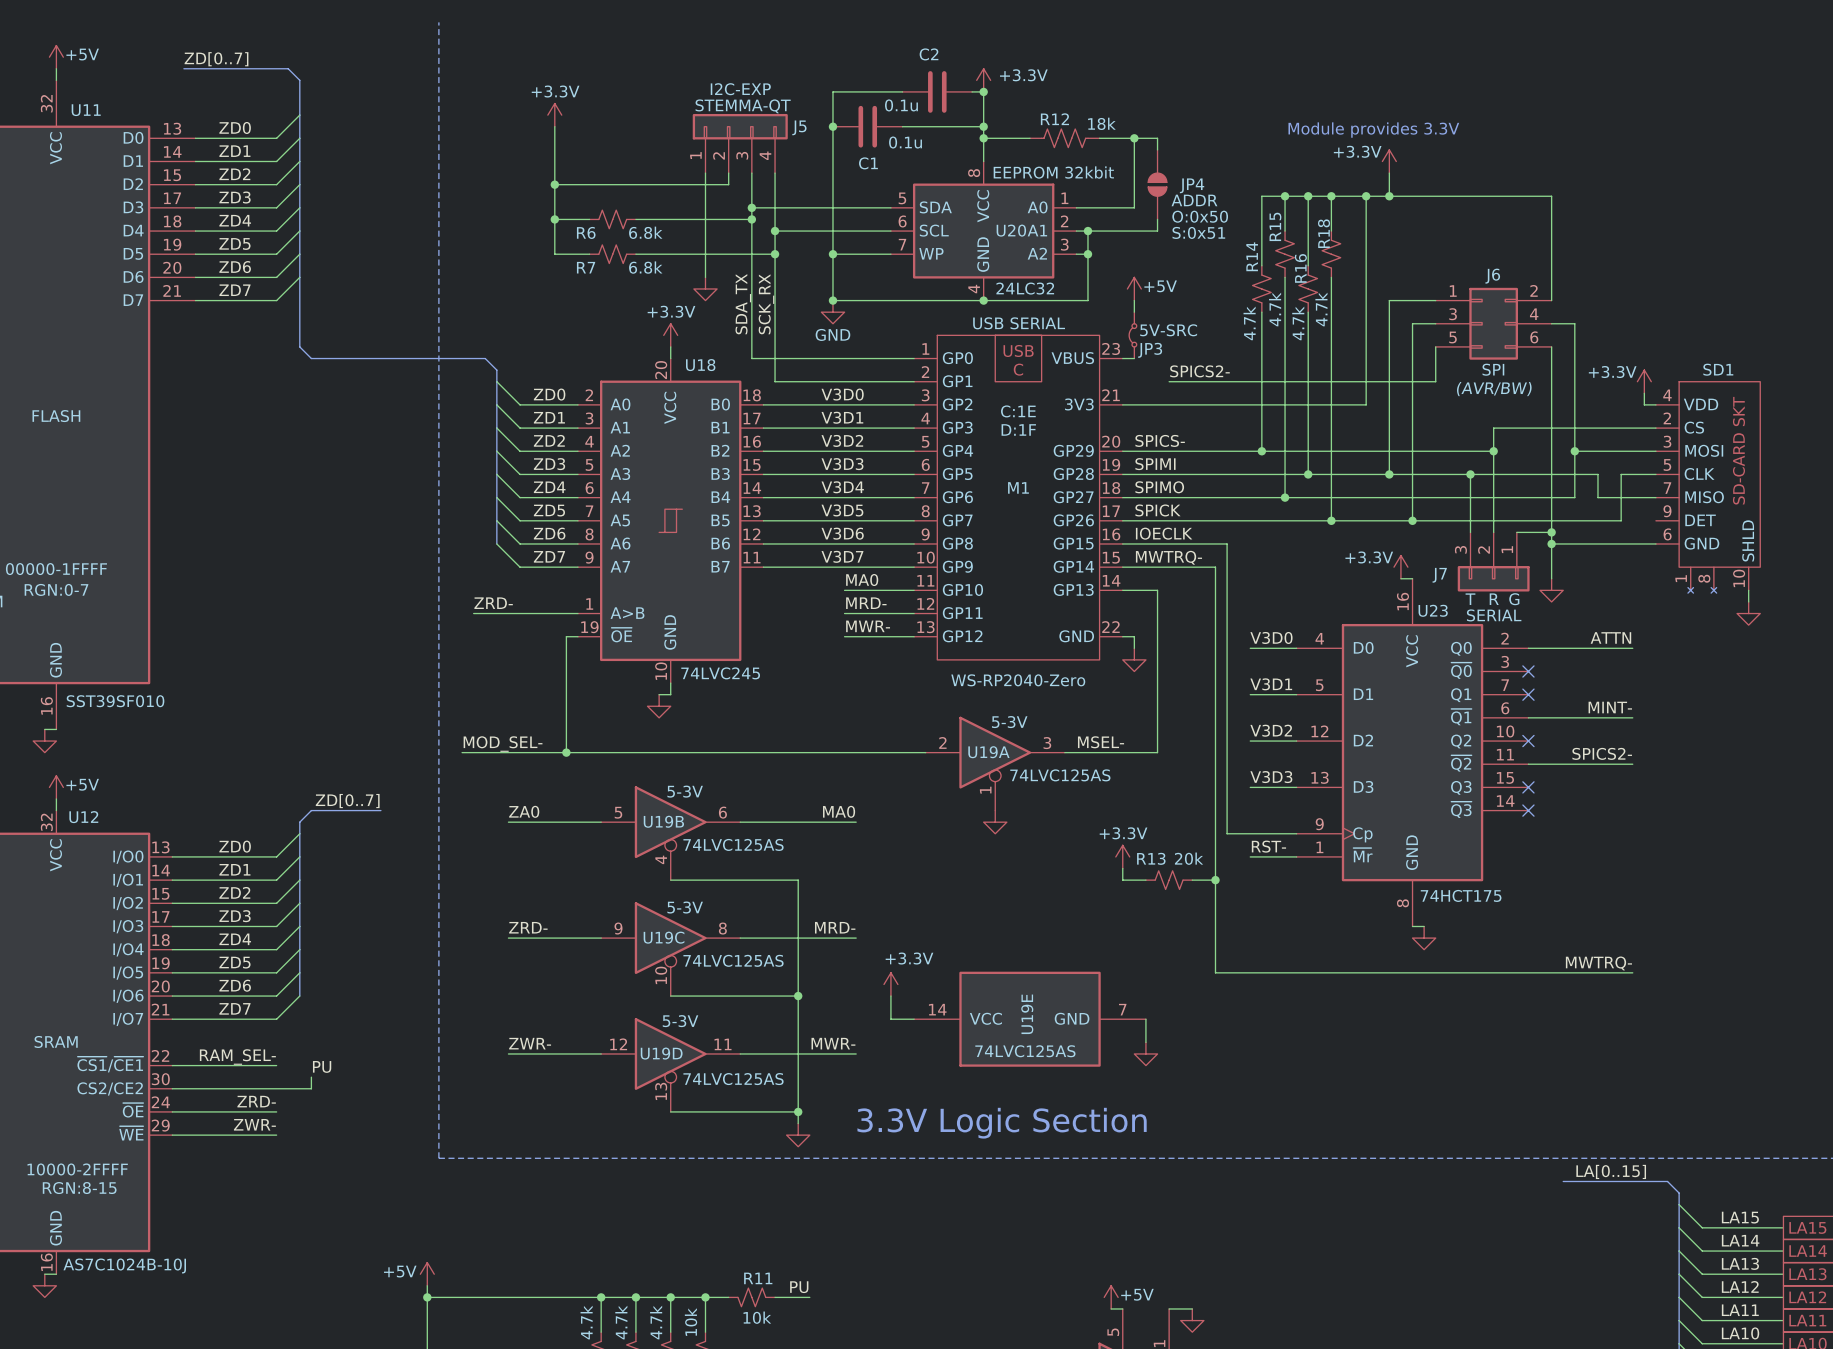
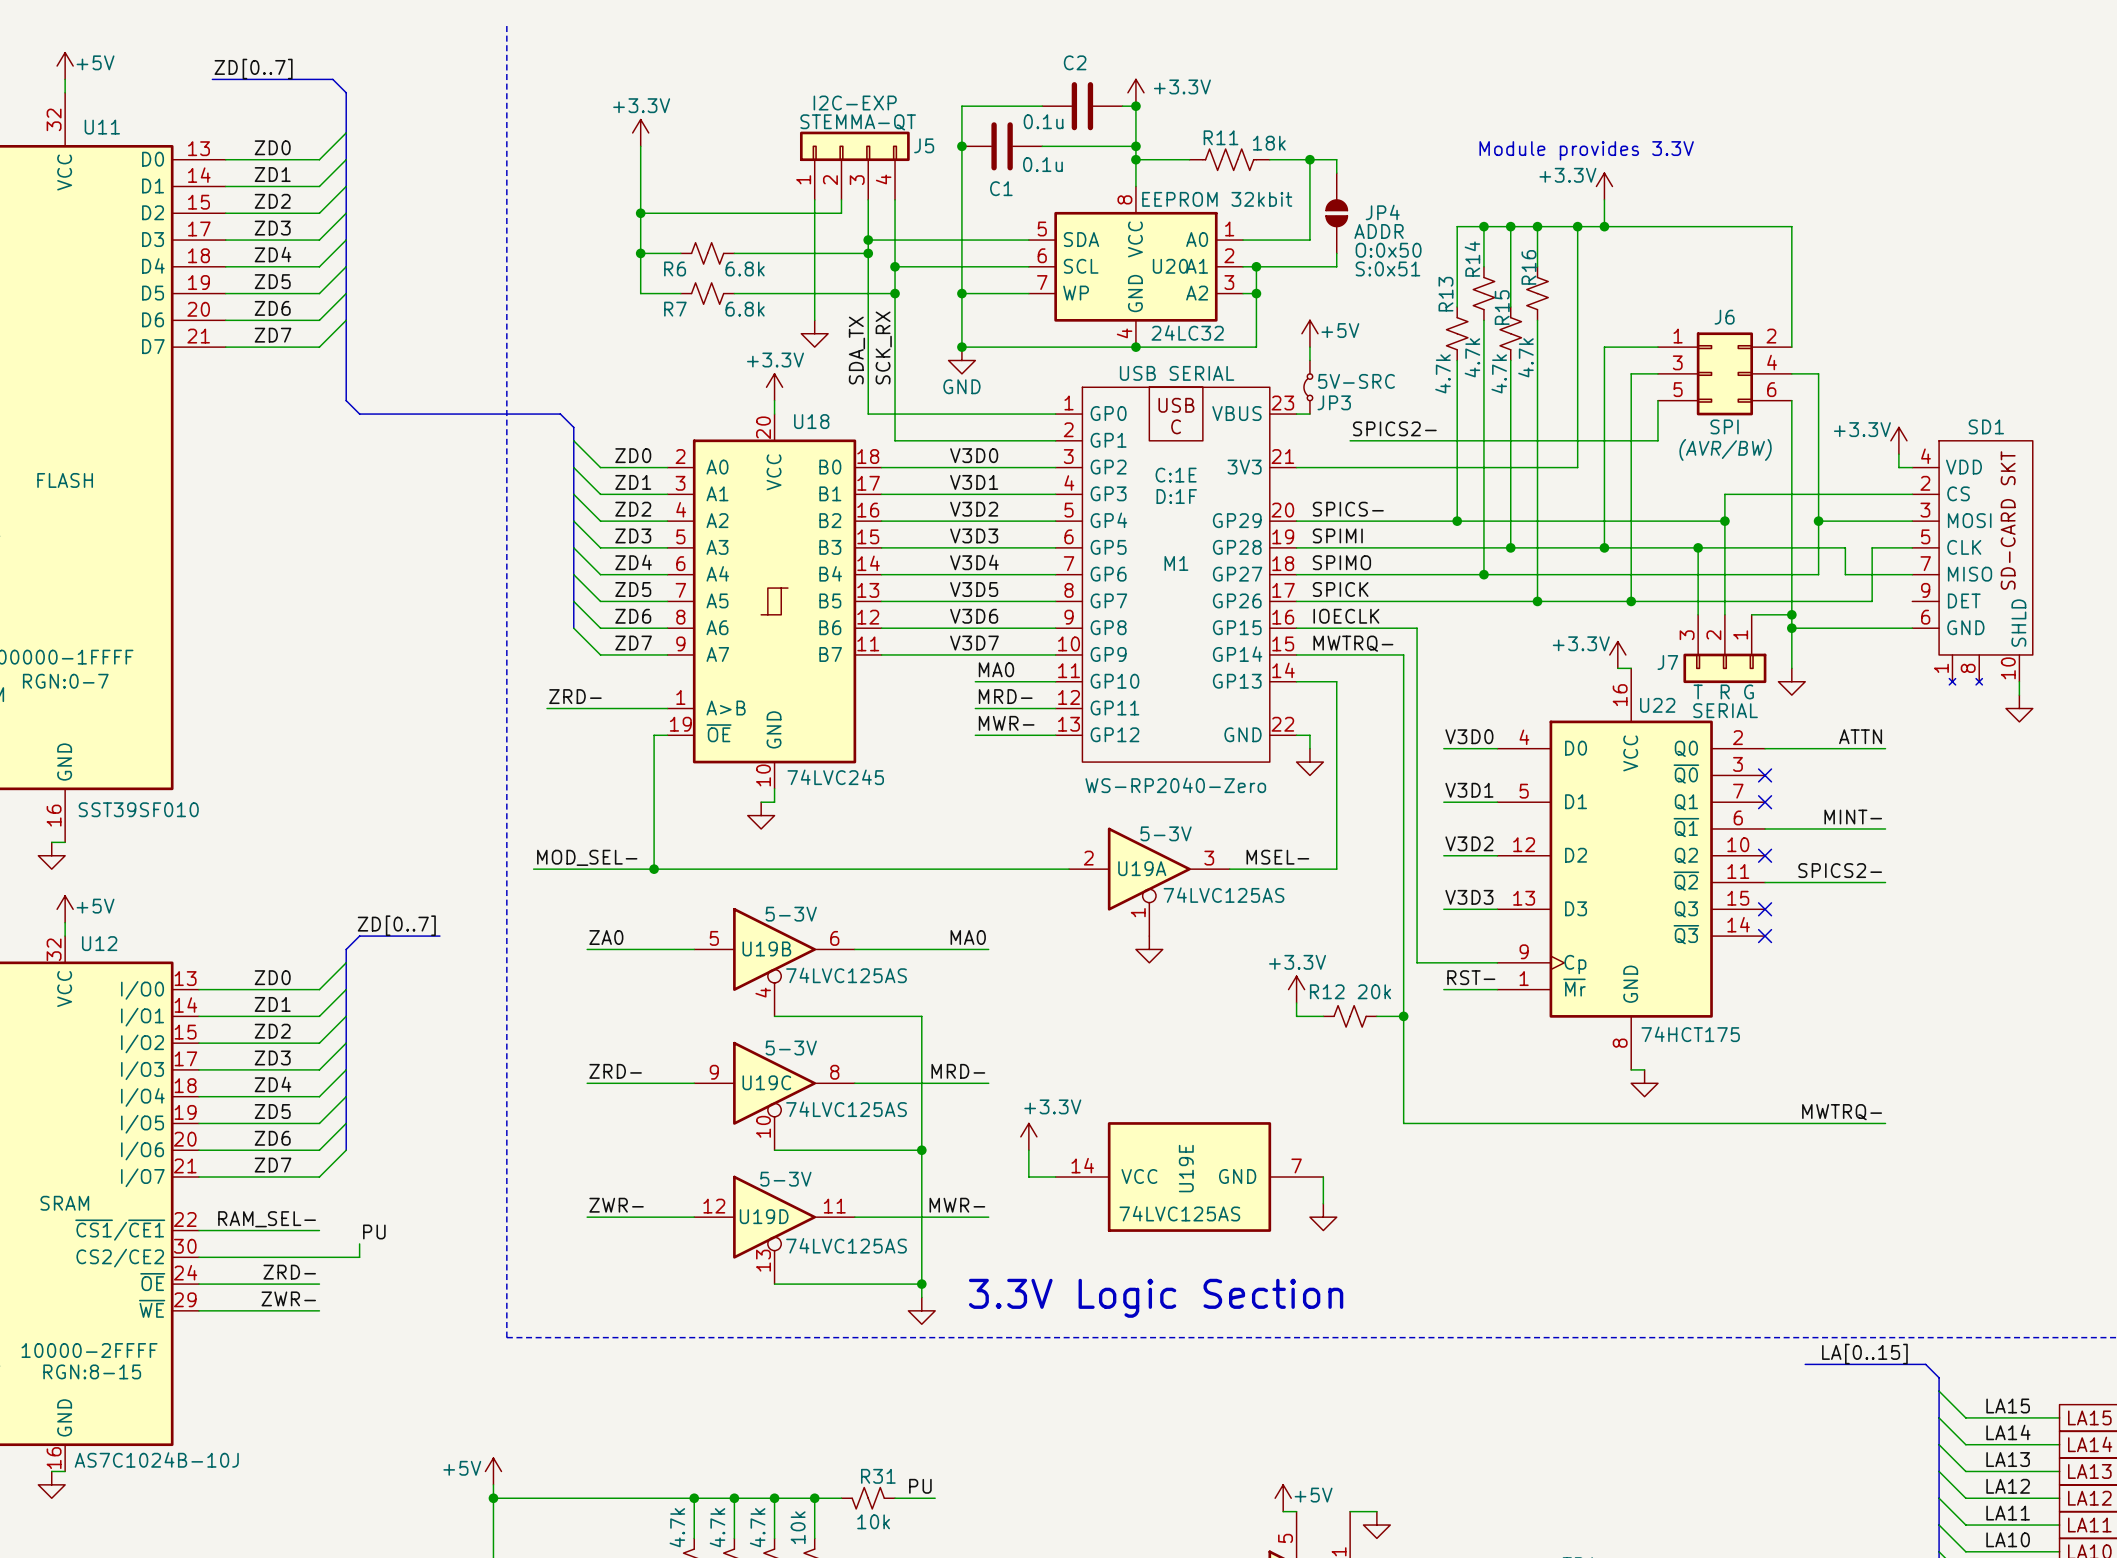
R12 name: R12 (1054, 119) -> R11 (1221, 137)
R15 name: R15 (1275, 226) -> R14 (1472, 259)
R18 name: R18 (1324, 233) -> R16 (1528, 267)
R14 name: R14 (1252, 256) -> R13 (1445, 294)
R16 name: R16 (1300, 268) -> R15 (1502, 307)
U23 name: U23 (1433, 610) -> U22 (1657, 705)
R13 name: R13 (1151, 858) -> R12 (1327, 991)
R11 name: R11 (758, 1278) -> R31 (878, 1476)

